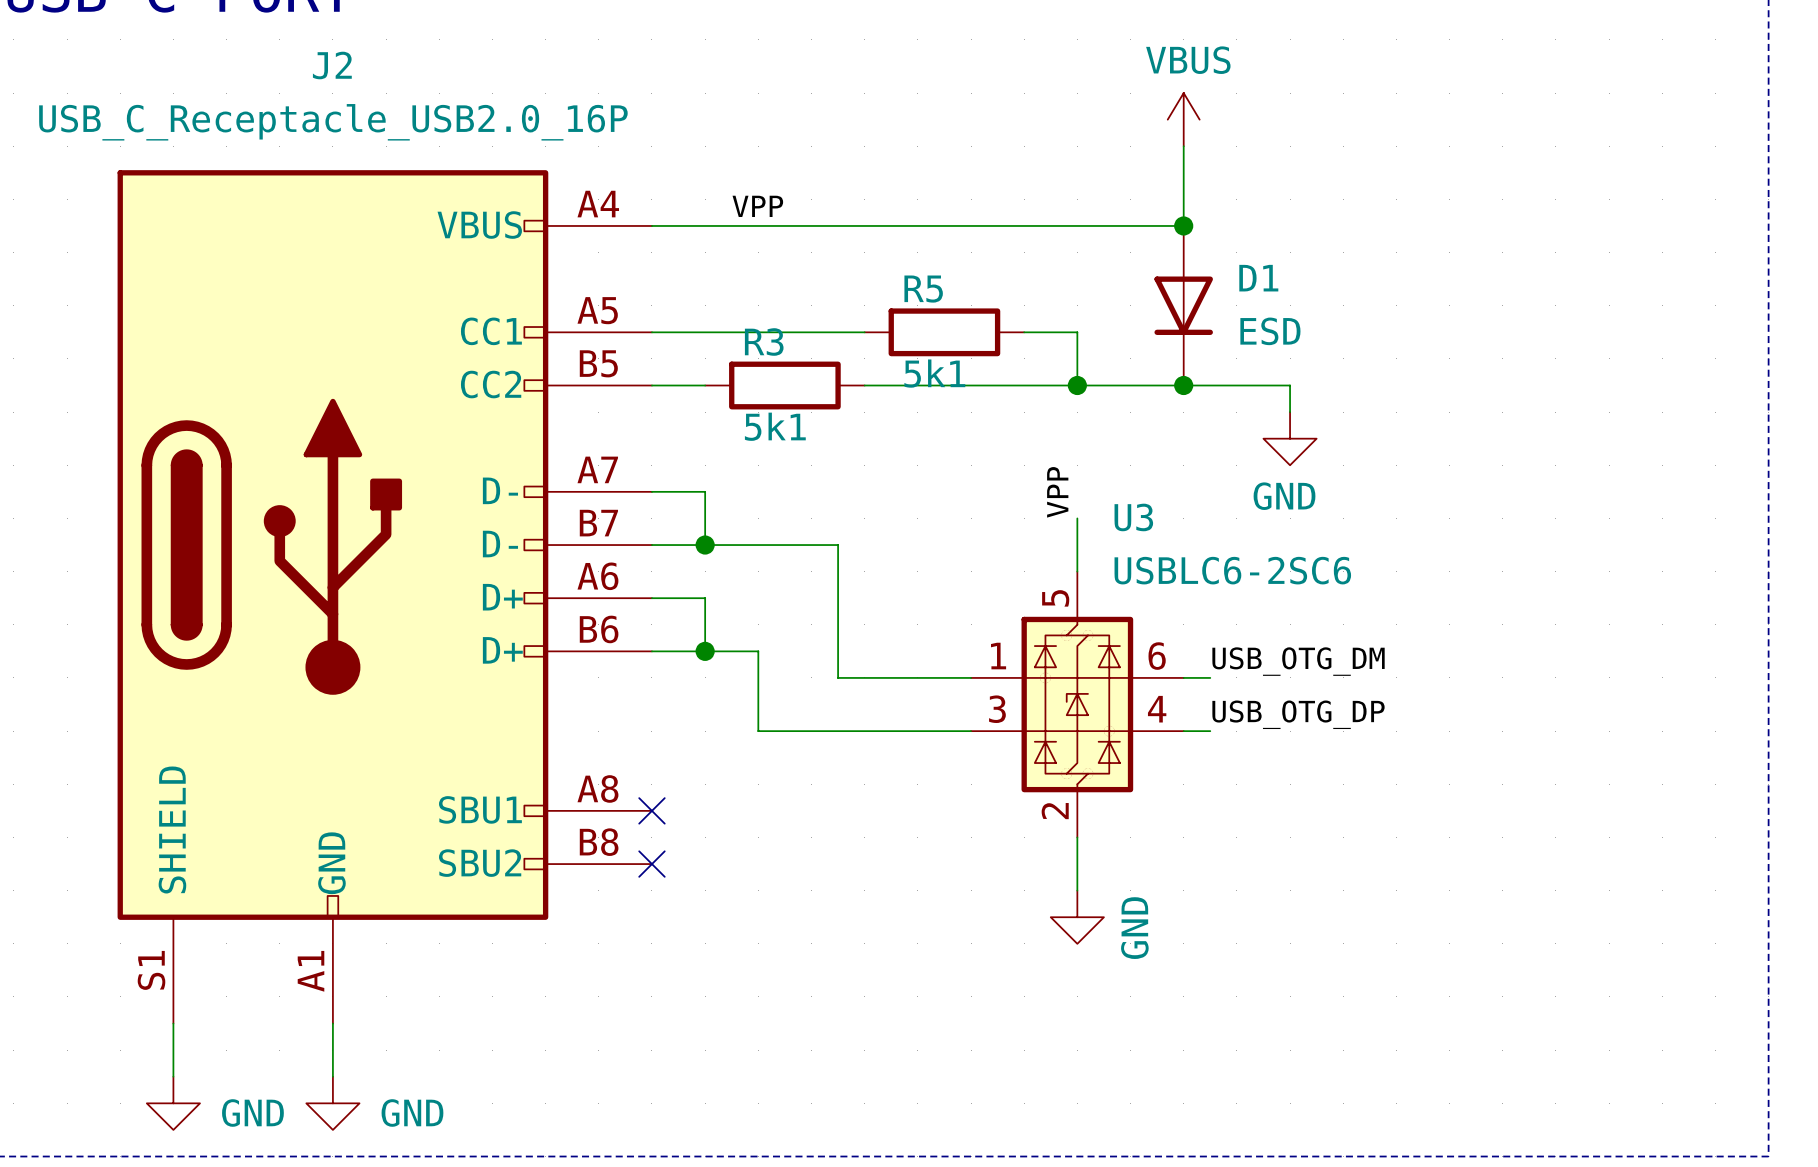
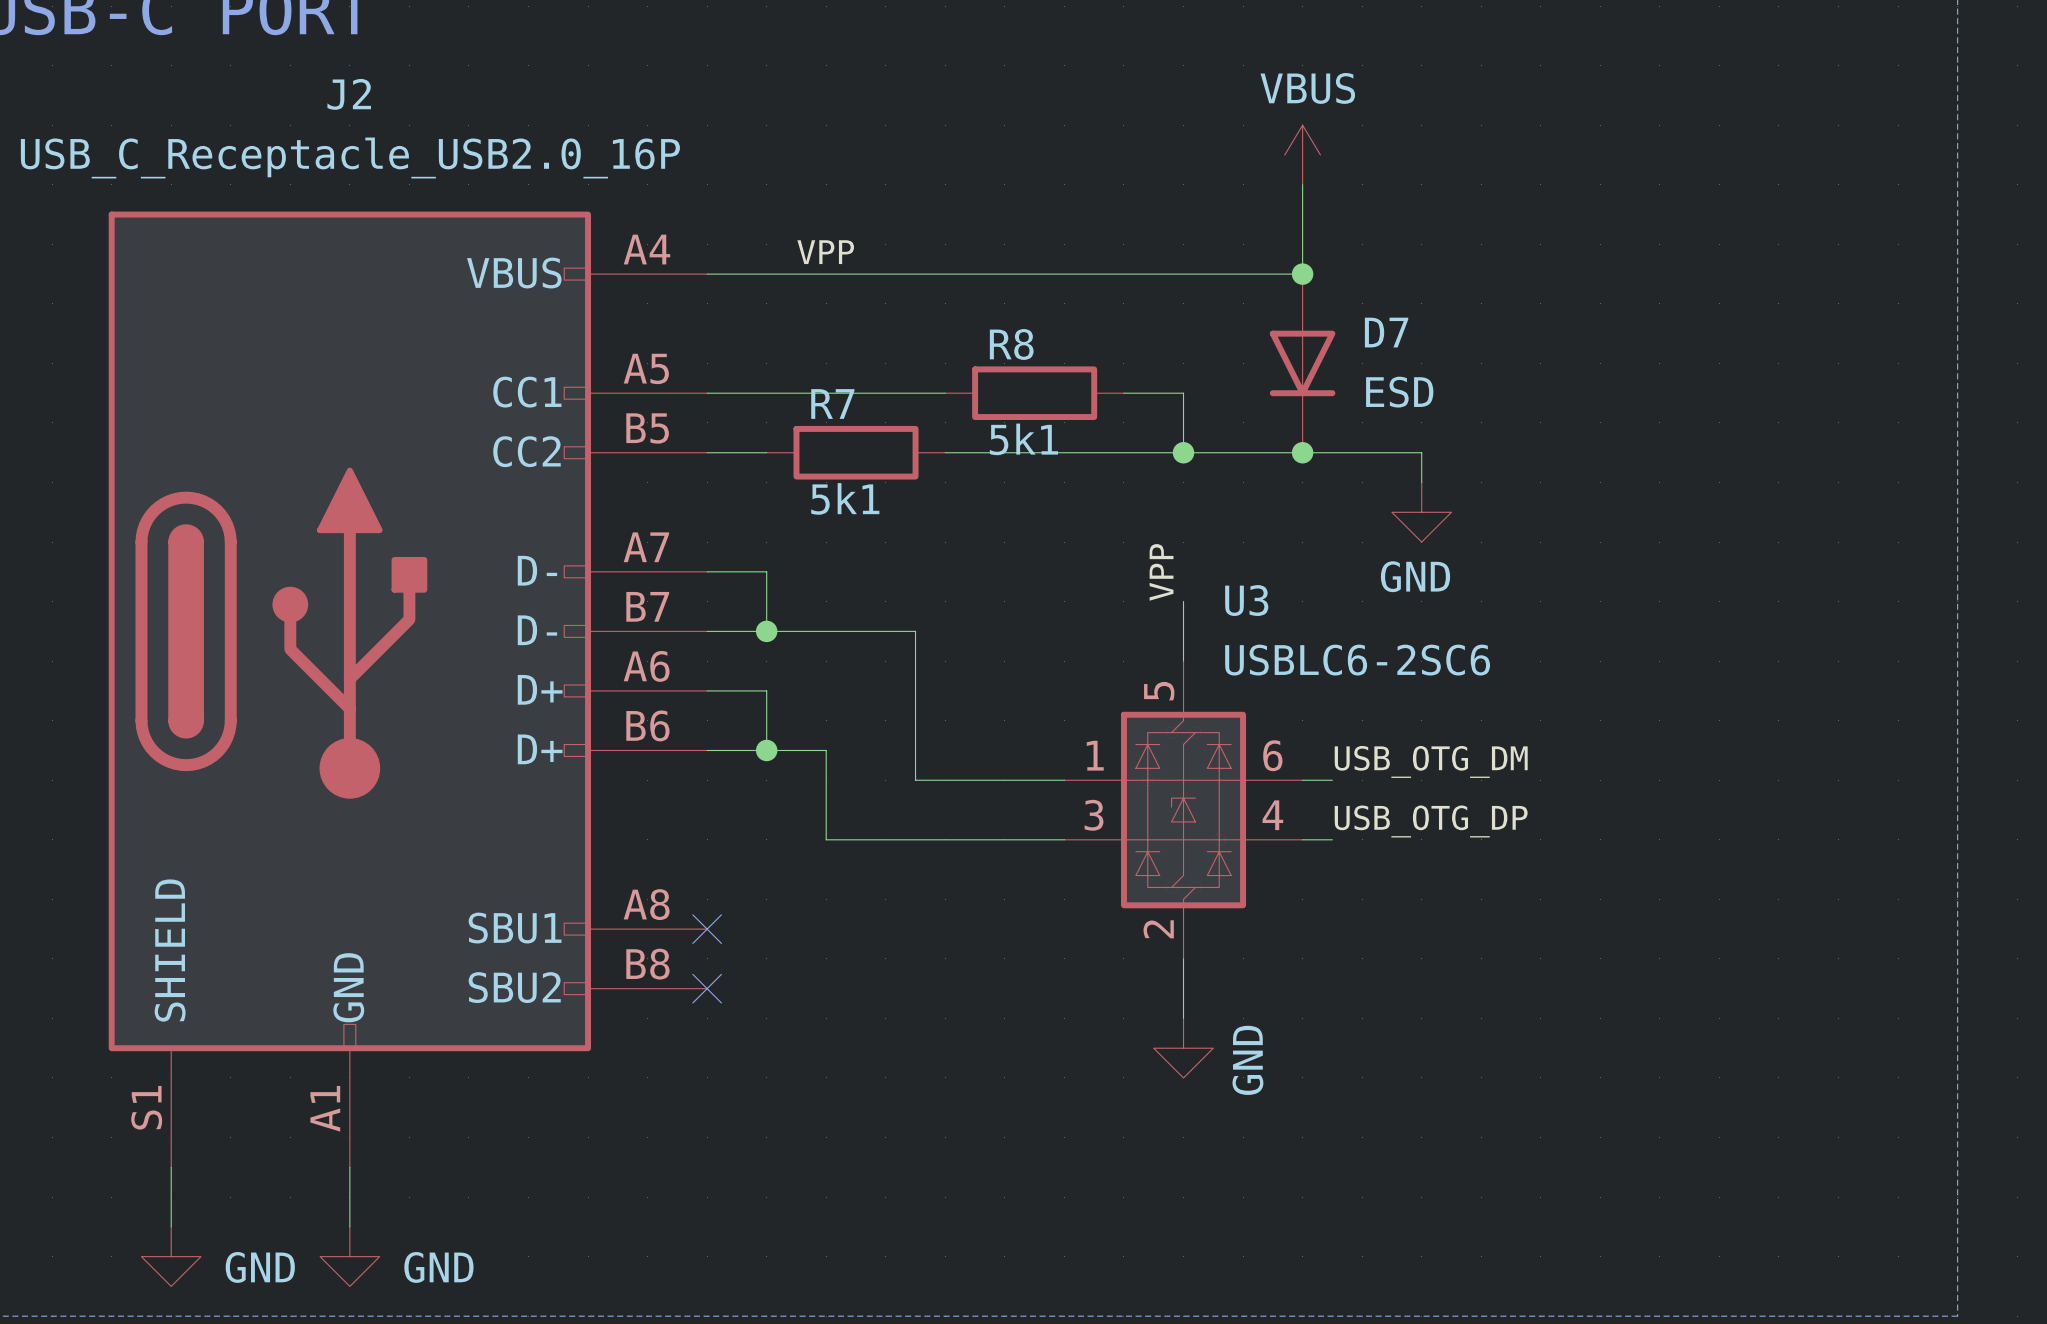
D1 name: D1 (1258, 278) -> D7 (1386, 332)
R5 name: R5 (923, 289) -> R8 (1011, 344)
R3 name: R3 (764, 341) -> R7 (832, 404)

